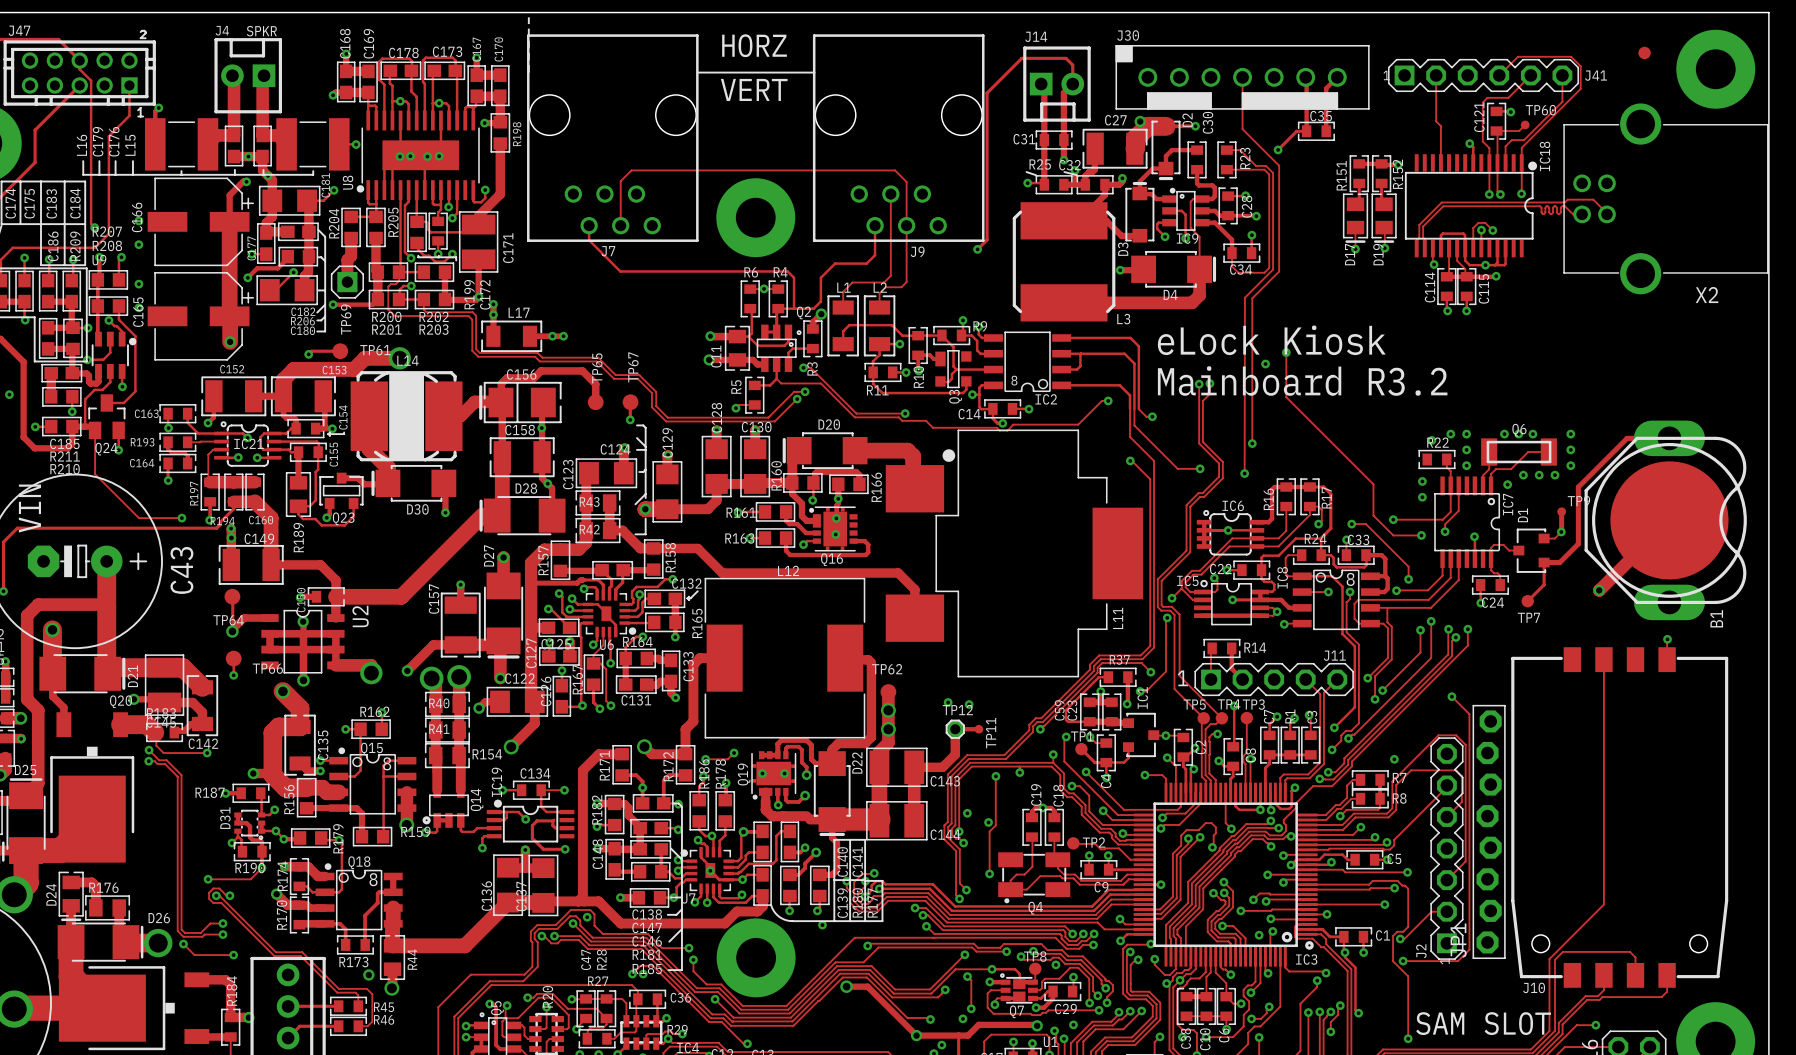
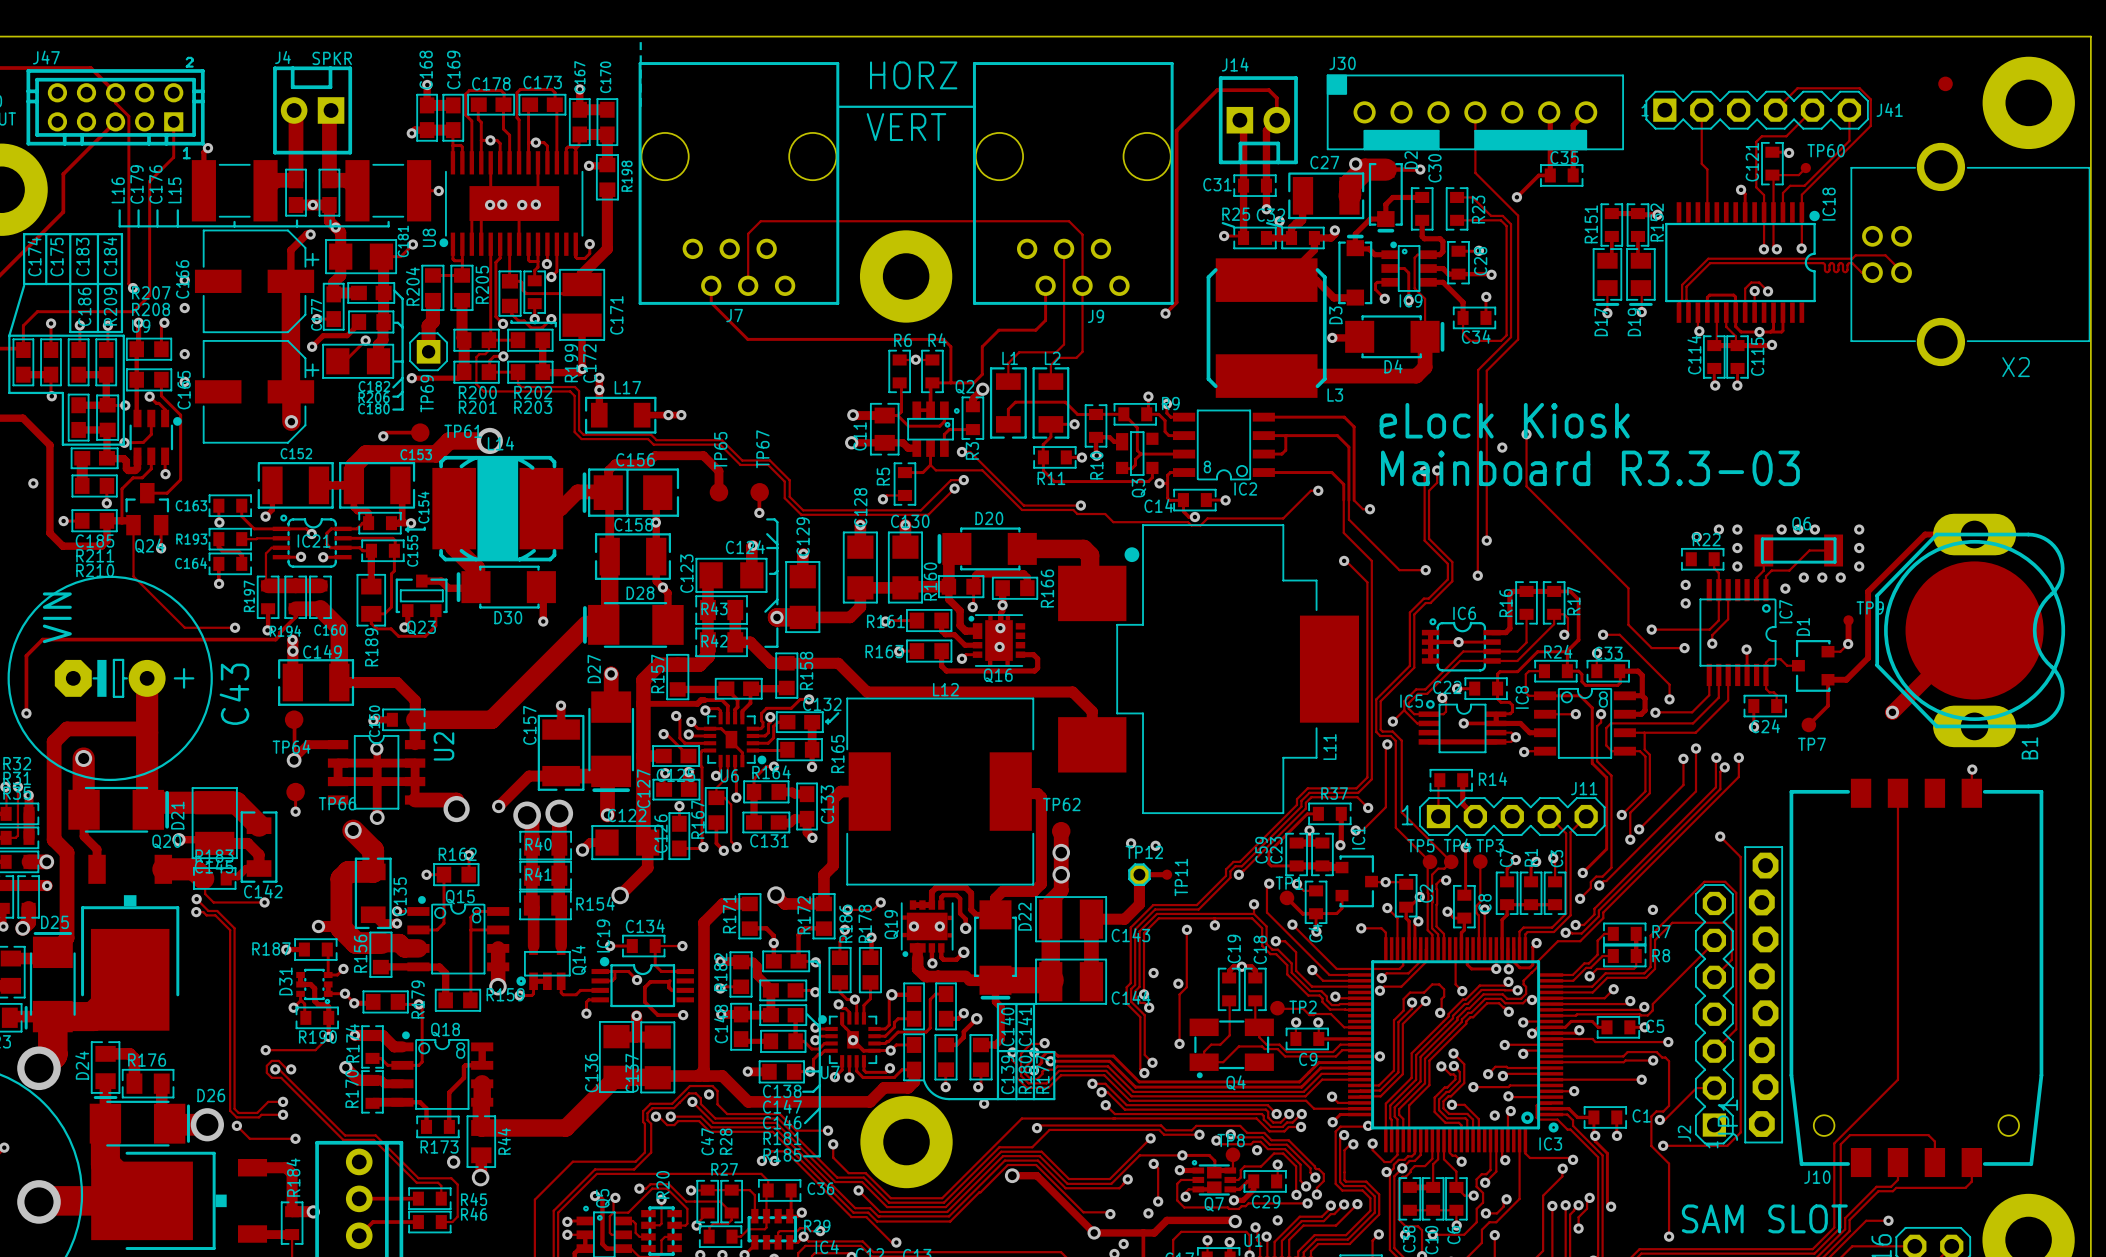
text: Mainboard R3.2 (1302, 381) -> Mainboard R3.3-03 (1590, 468)

